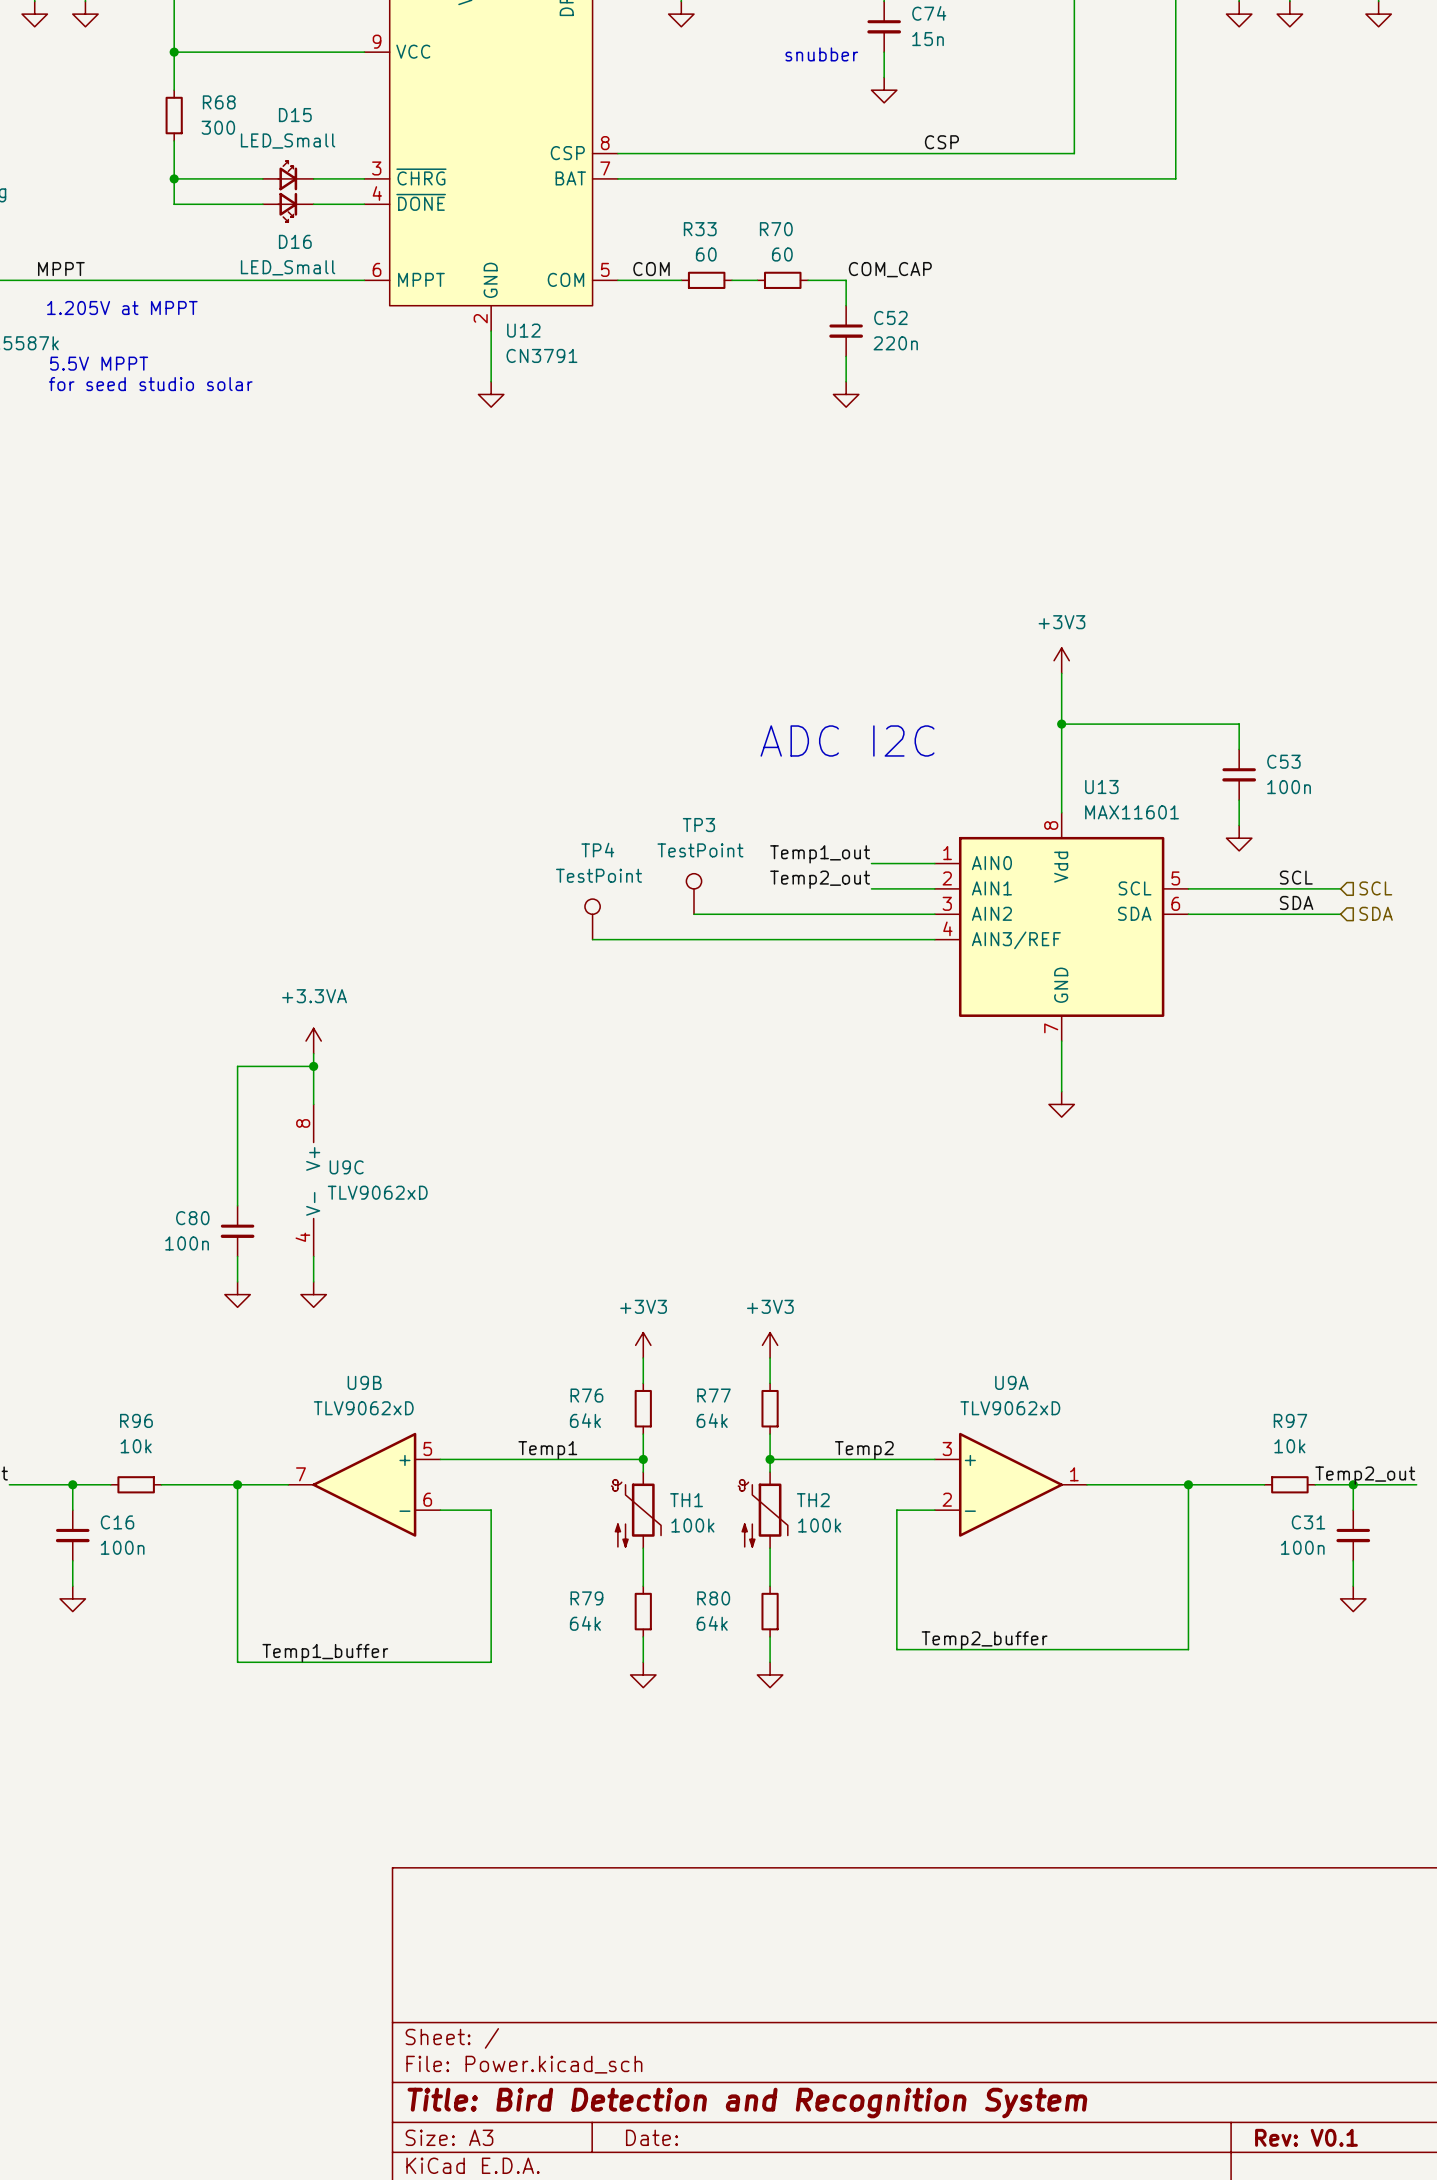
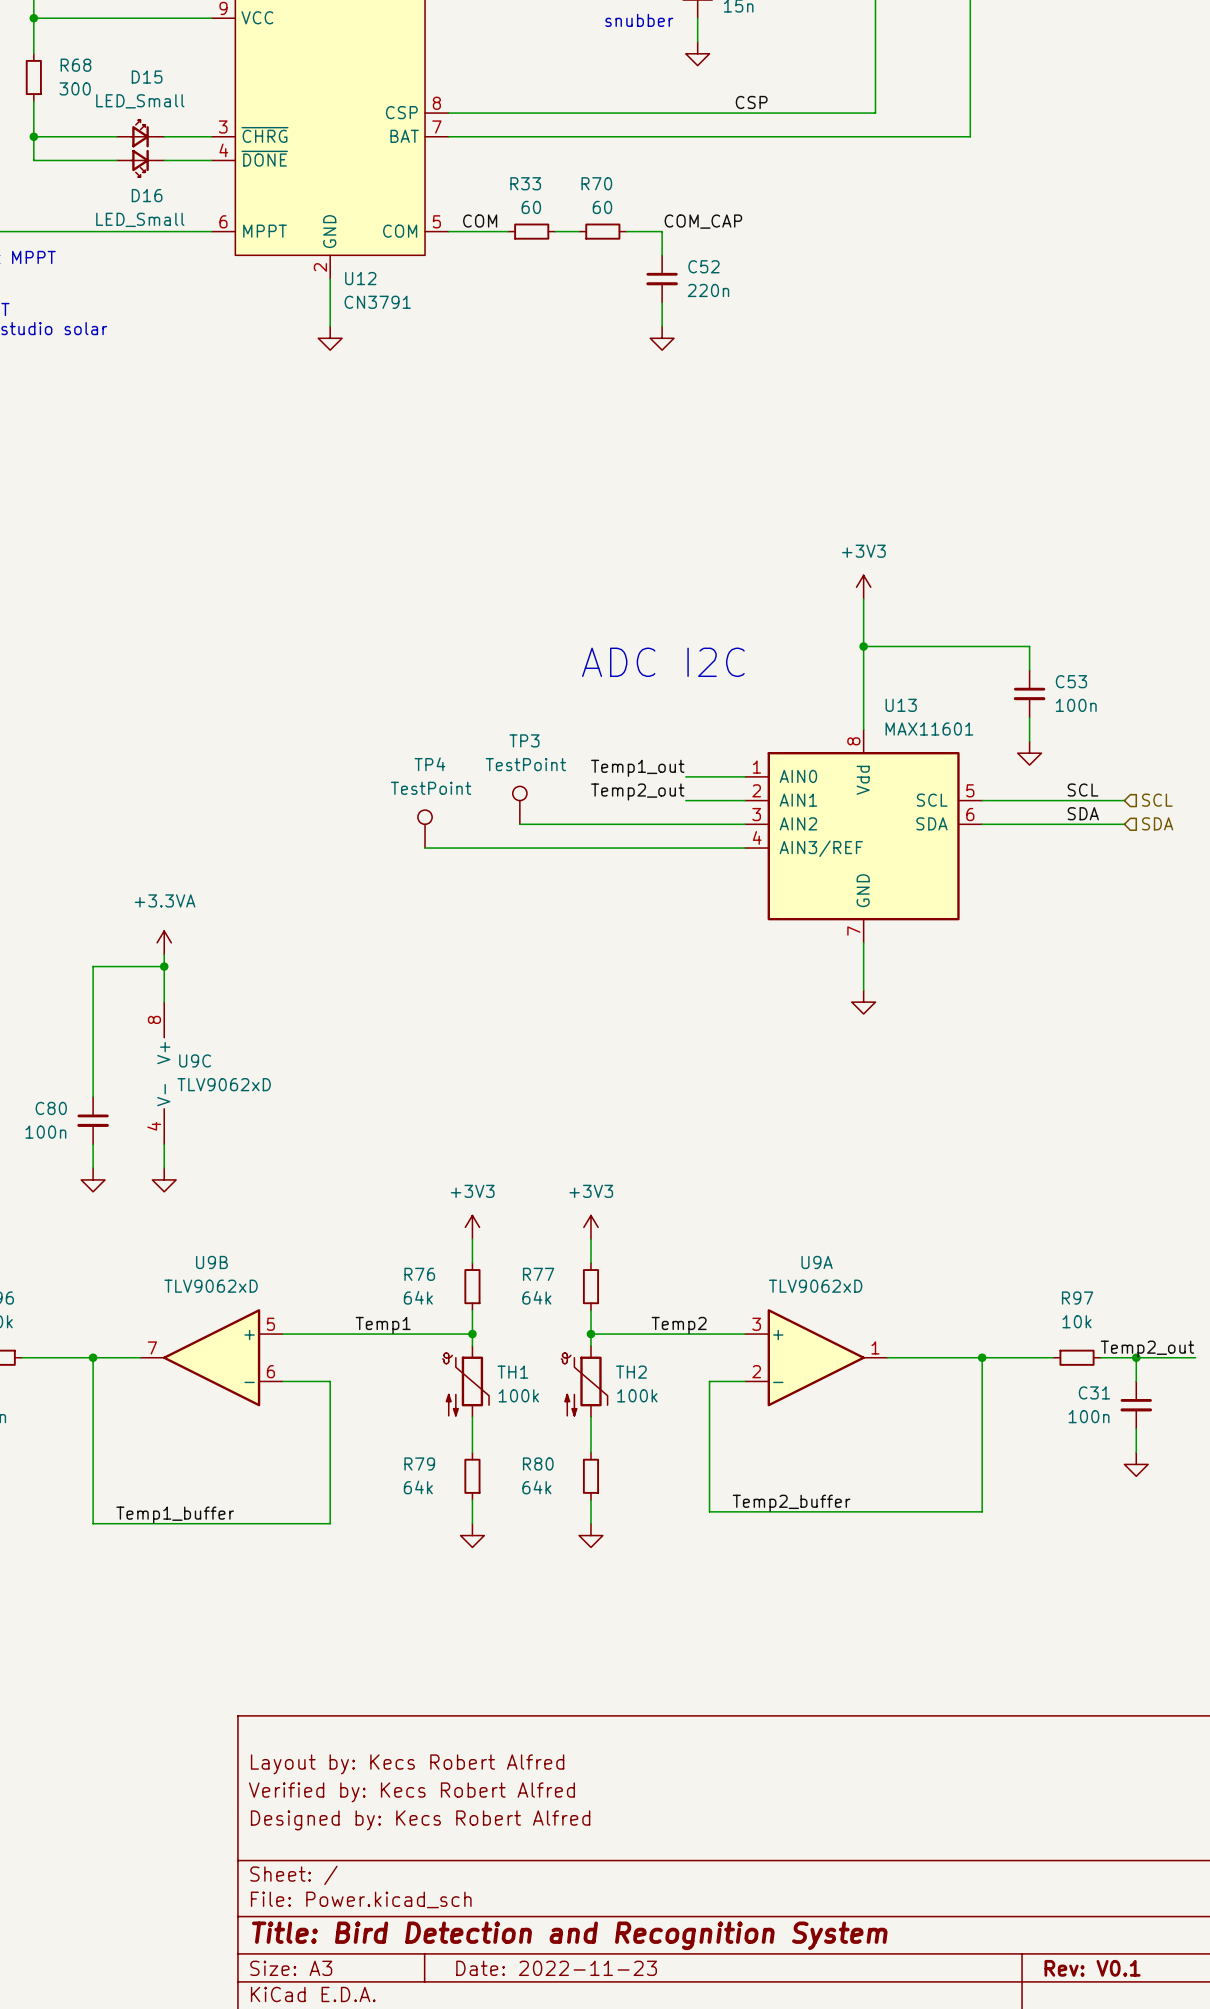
title block: none -> Layout by: Kecs Robert Alfred (407, 1764)
title block: none -> Verified by: Kecs Robert Alfred (411, 1792)
title block: none -> Designed by: Kecs Robert Alfred (420, 1820)
title block: Date: (652, 2137) -> Date: 2022-11-23 (556, 1968)

